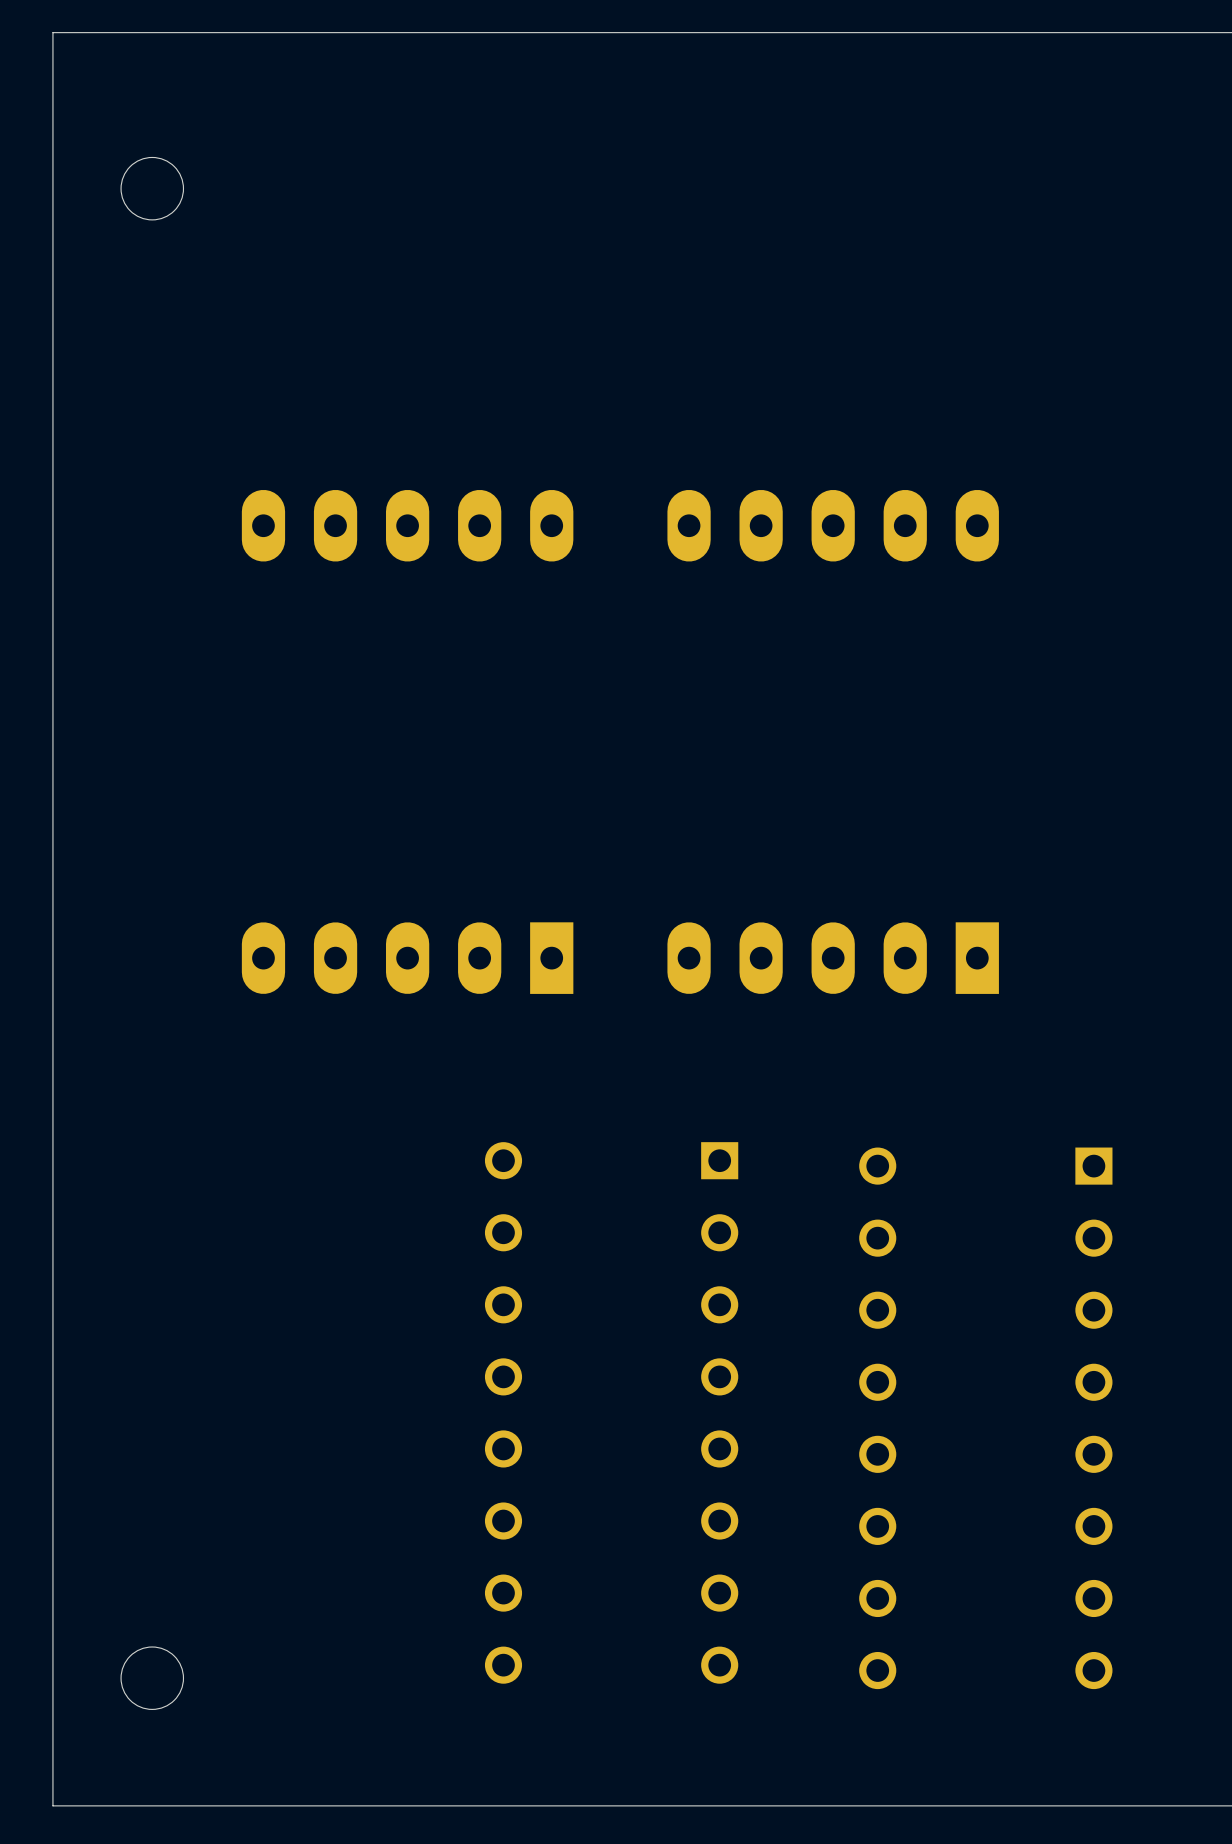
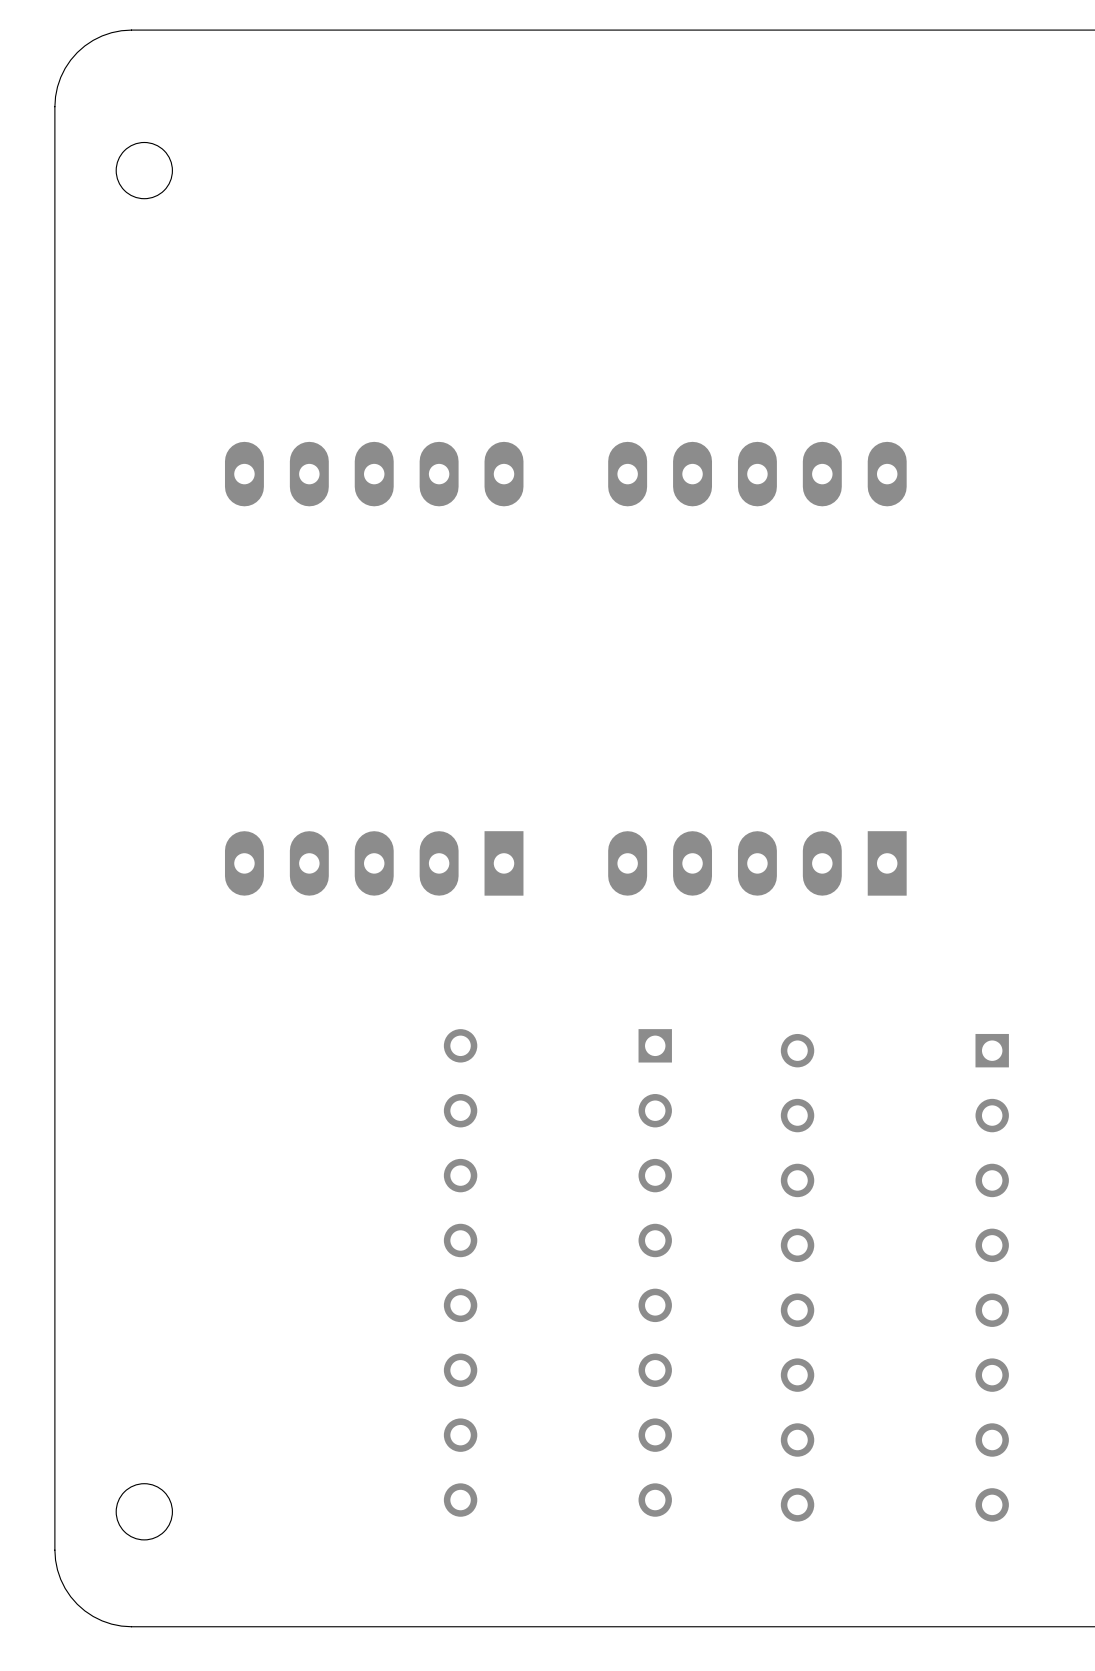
board edge: (138, 32) (52, 32) (52, 117) -> (131, 30) (102, 35) (77, 52) (60, 77) (54, 106)
board edge: (52, 1720) (52, 1805) (138, 1805) -> (54, 1550) (60, 1579) (77, 1604) (102, 1620) (131, 1626)

